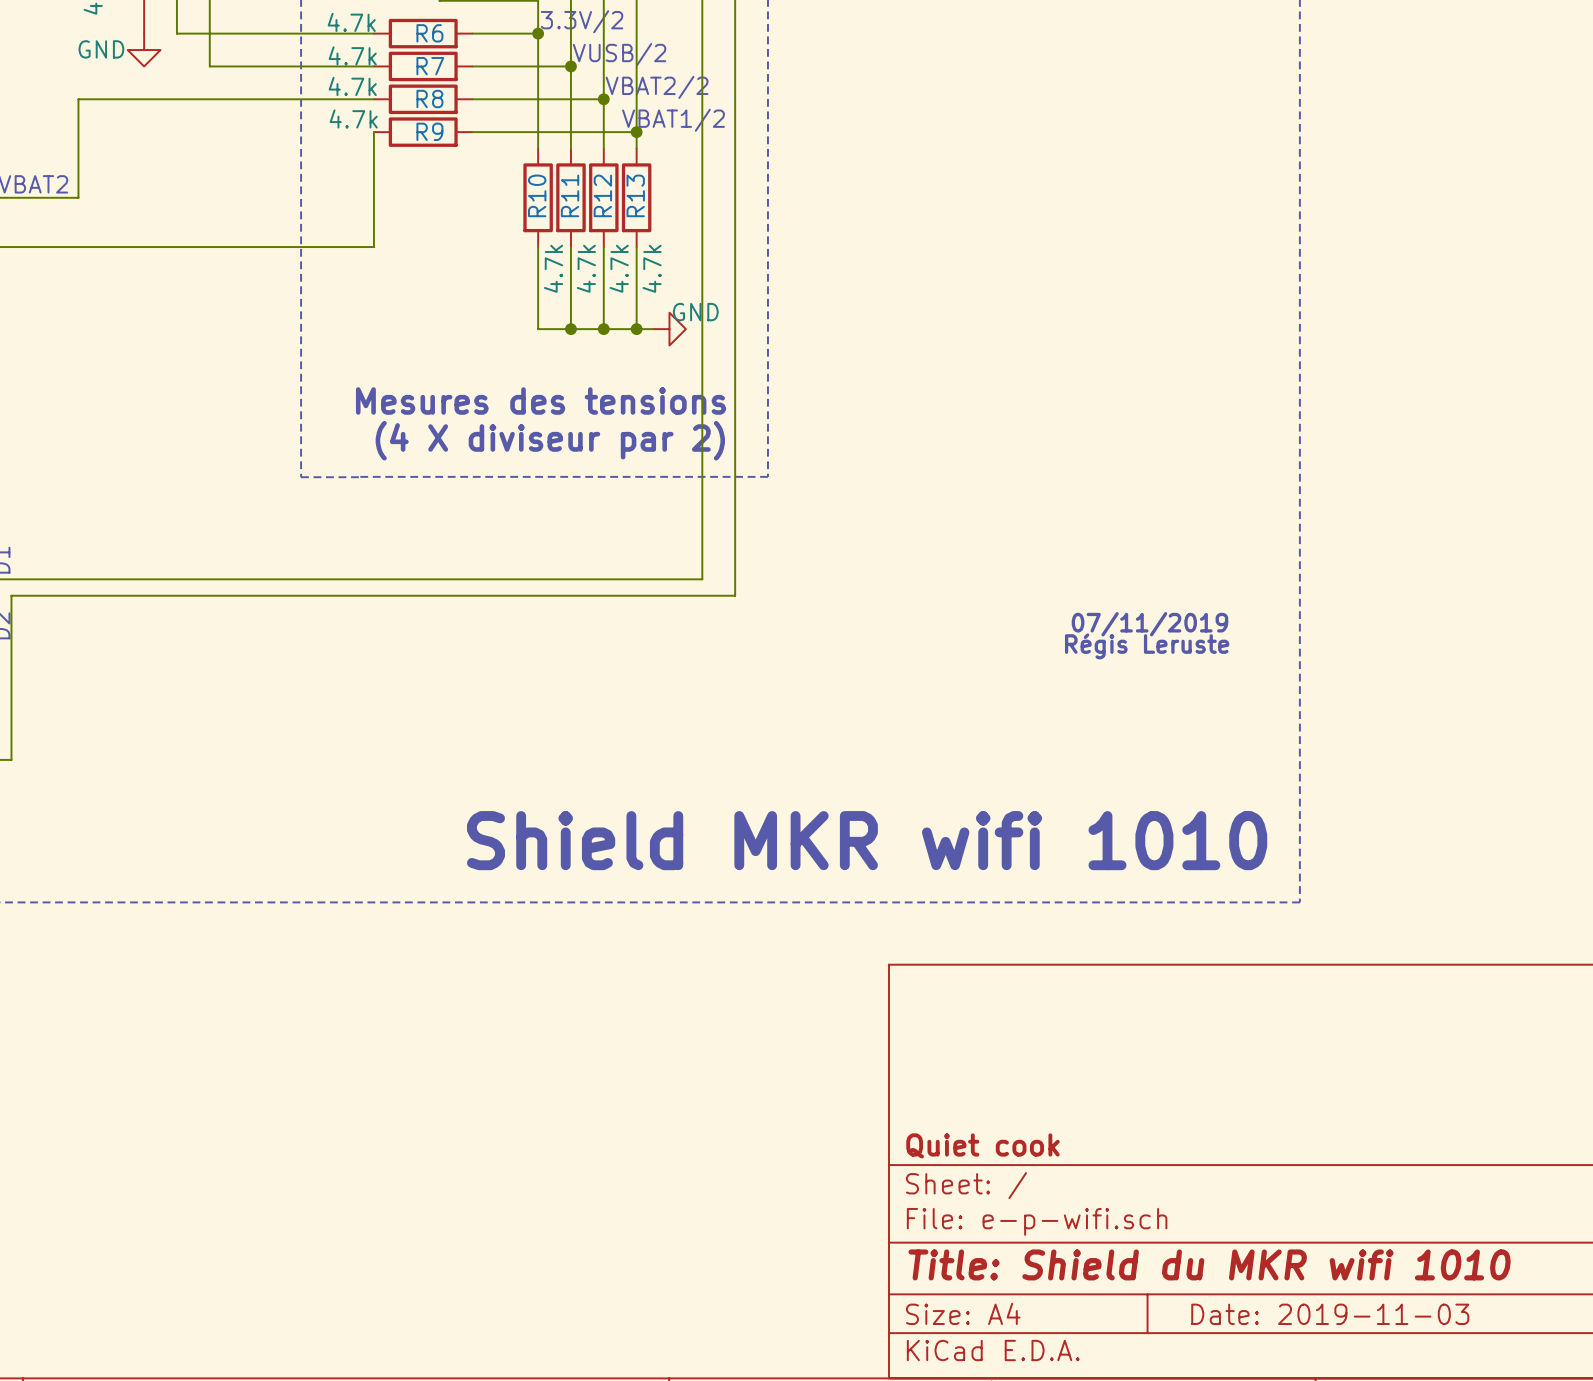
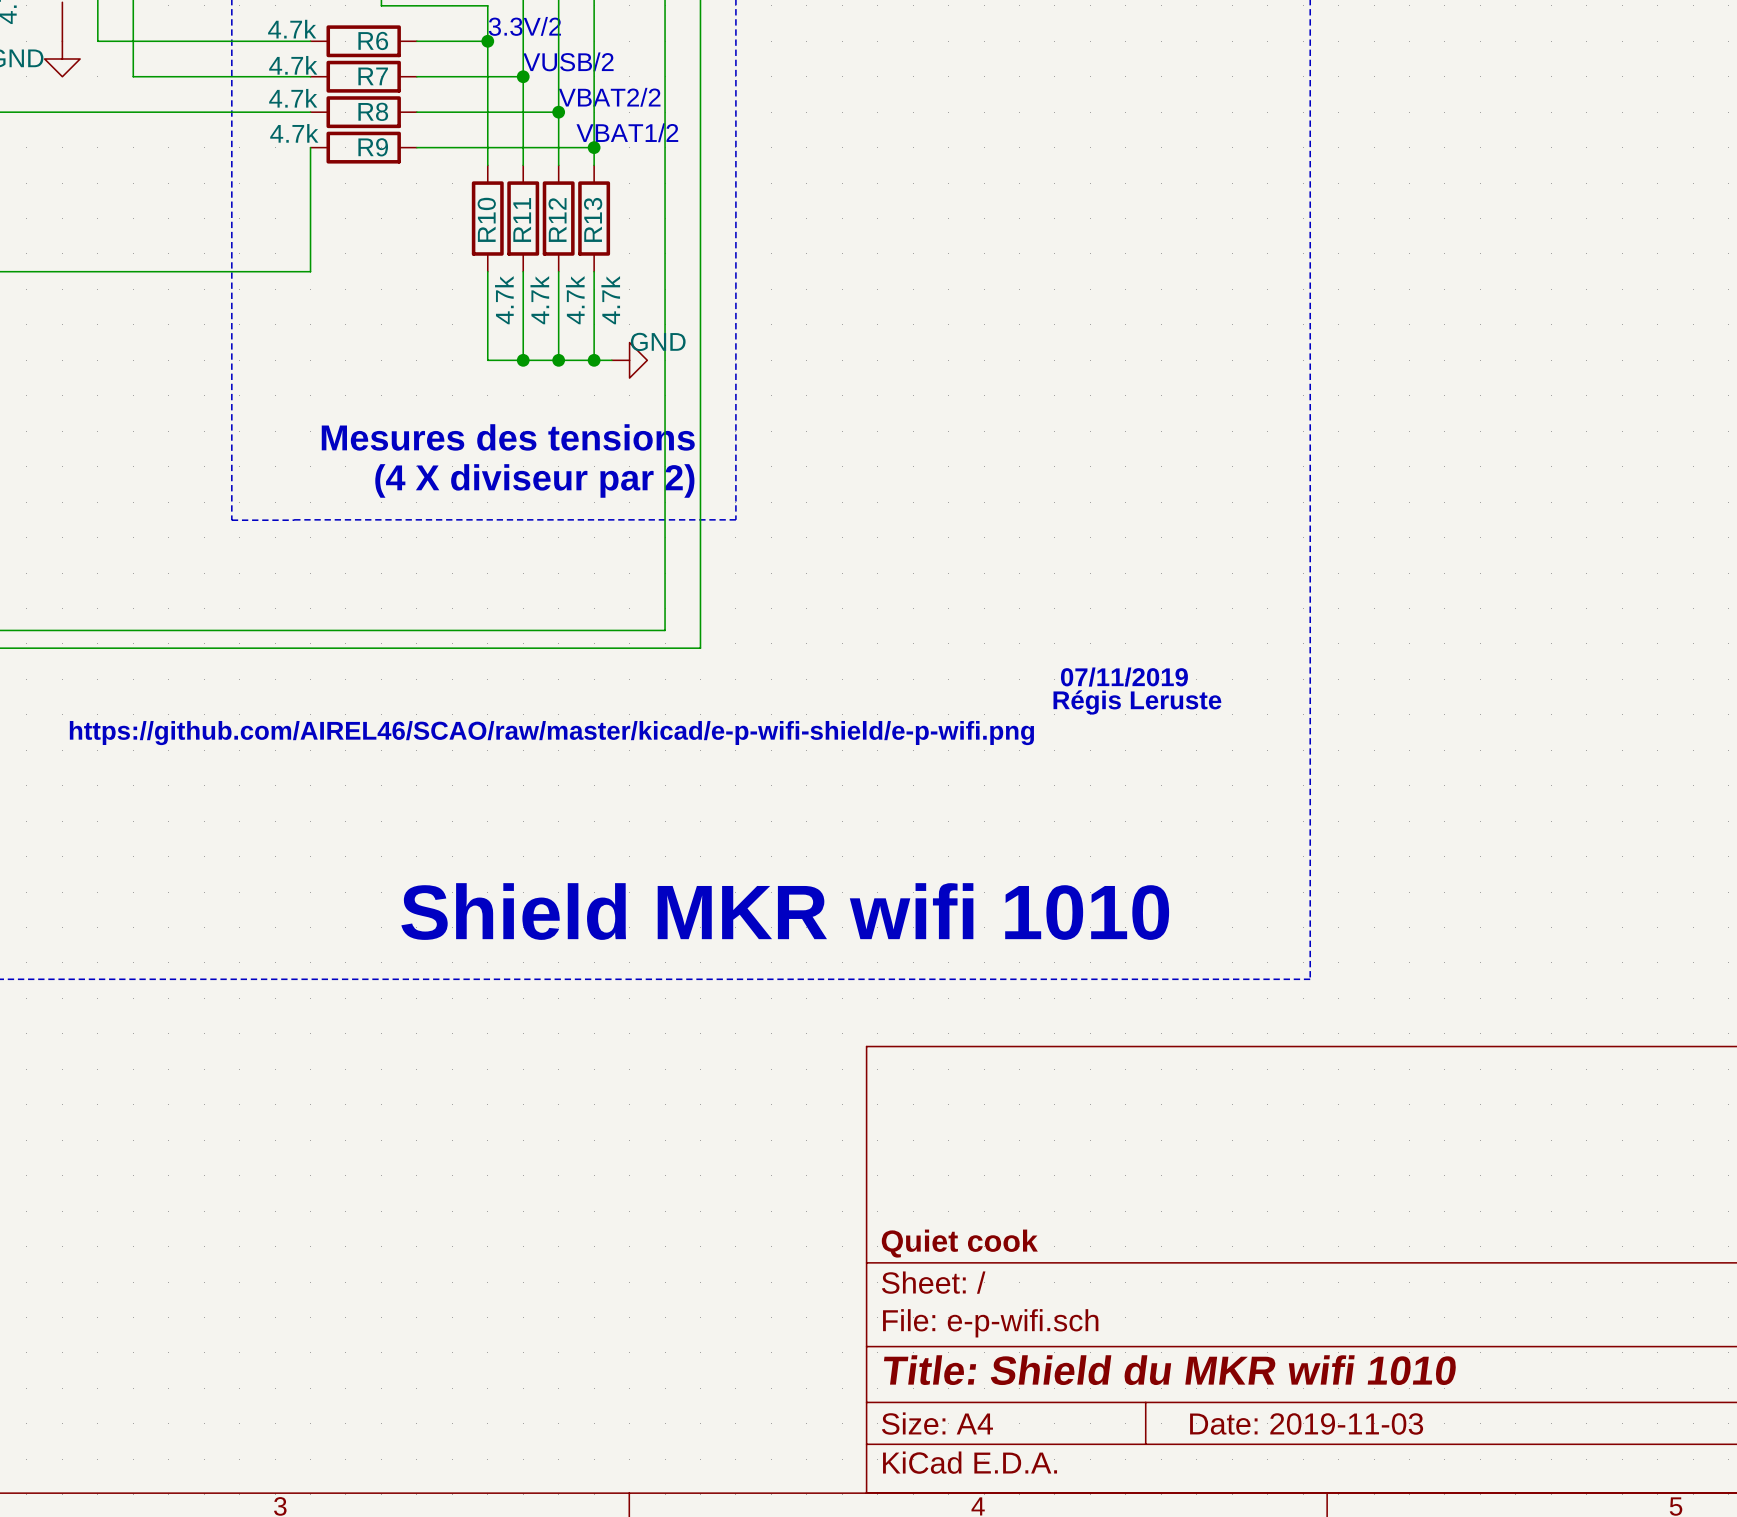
text: none -> https://github.com/AIREL46/SCAO/raw/master/kicad/e-p-wifi-shield/e-p-wifi.png (551, 733)

